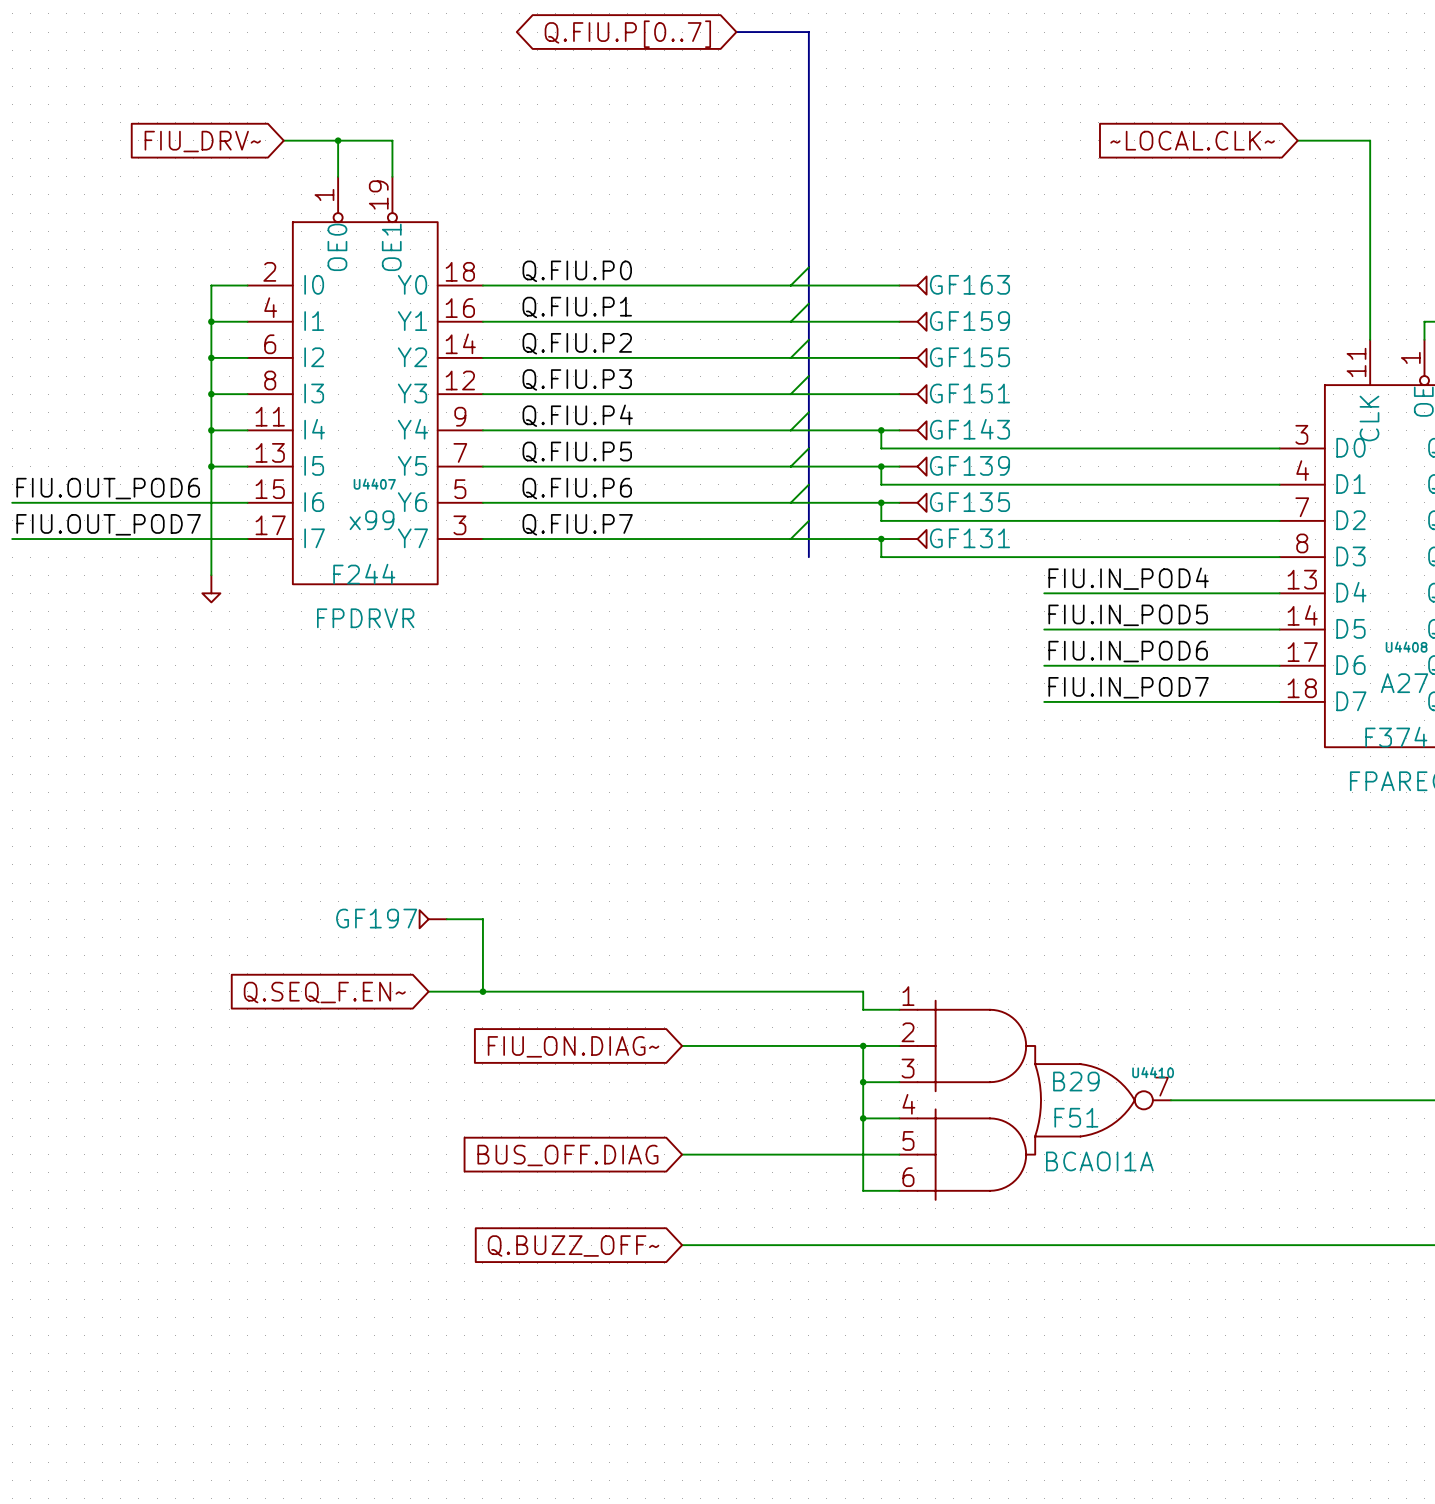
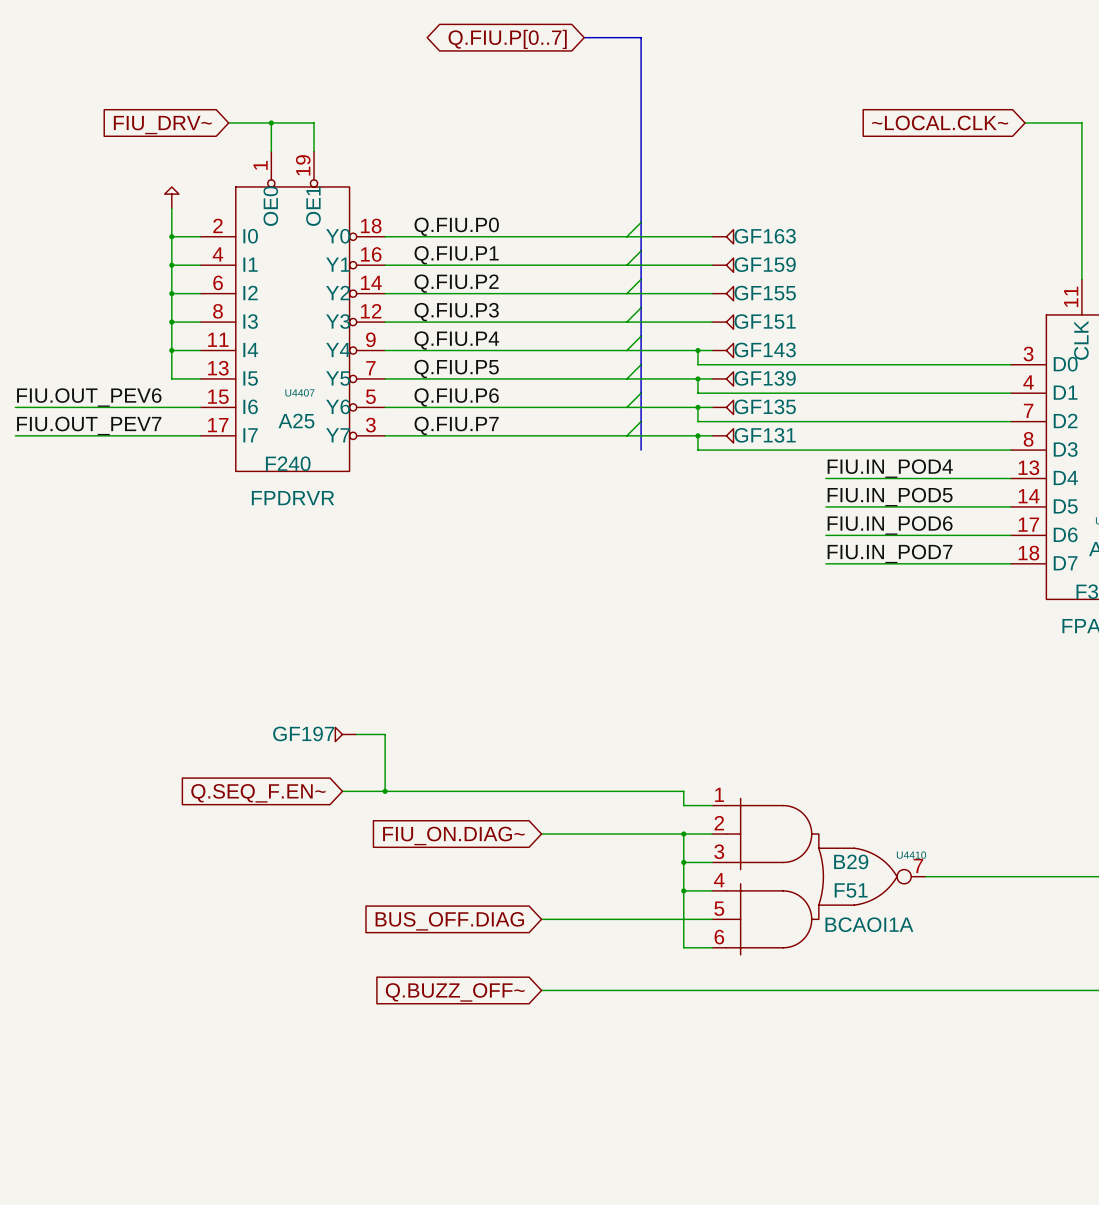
U4407 symbol: [247, 176, 483, 585] -> [200, 151, 386, 472]
power symbol: none -> (171, 197)
wire: none -> (171, 208) (171, 236)
junction: none -> (171, 236)
wire: (211, 466) (211, 575) -> none
junction: (211, 466) -> none
label: FIU.OUT_POD6 (108, 488) -> FIU.OUT_PEV6 (89, 397)
U4407 text: x99 (372, 520) -> A25 (296, 421)
label: FIU.OUT_POD7 (108, 524) -> FIU.OUT_PEV7 (89, 425)
U4407 value: F244 (364, 574) -> F240 (288, 463)
power symbol: (211, 589) -> none

